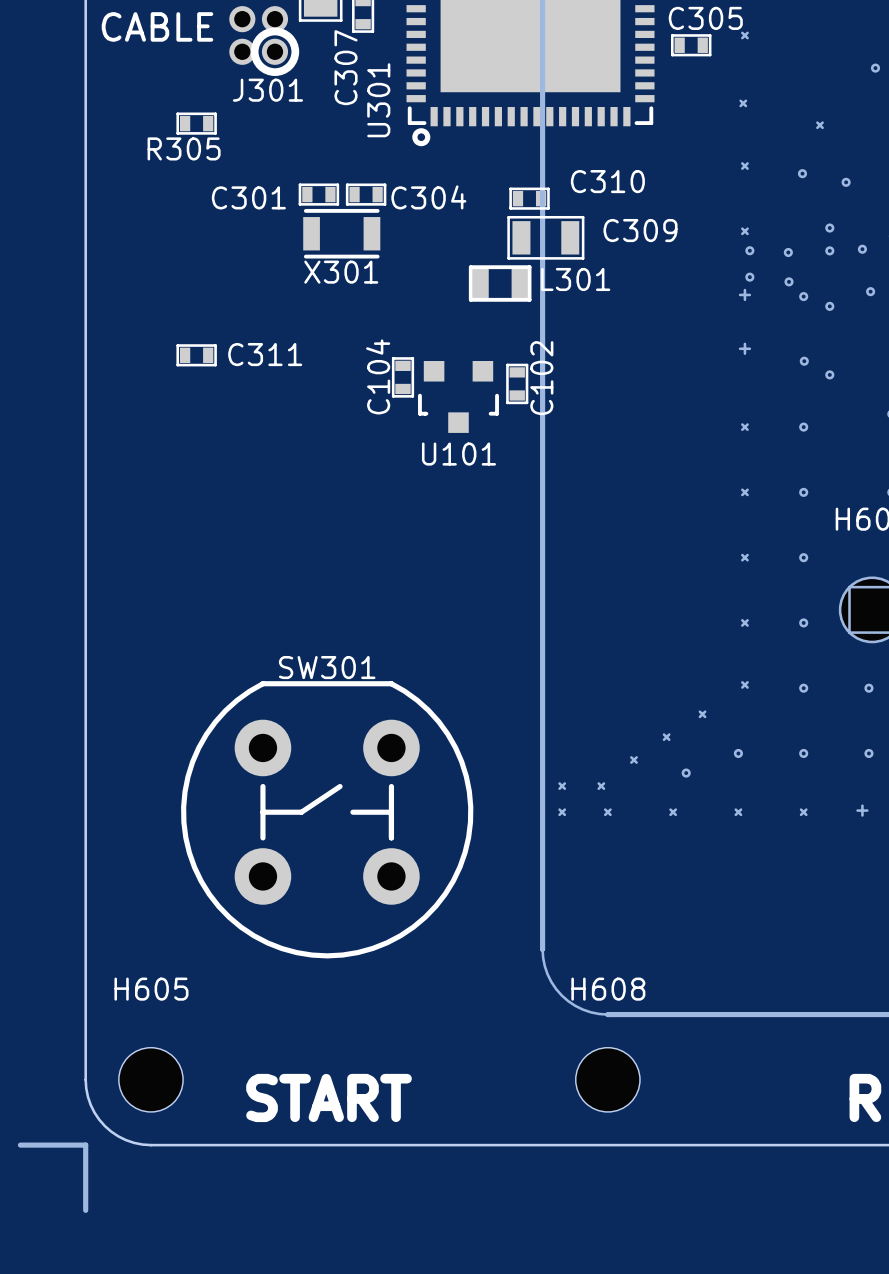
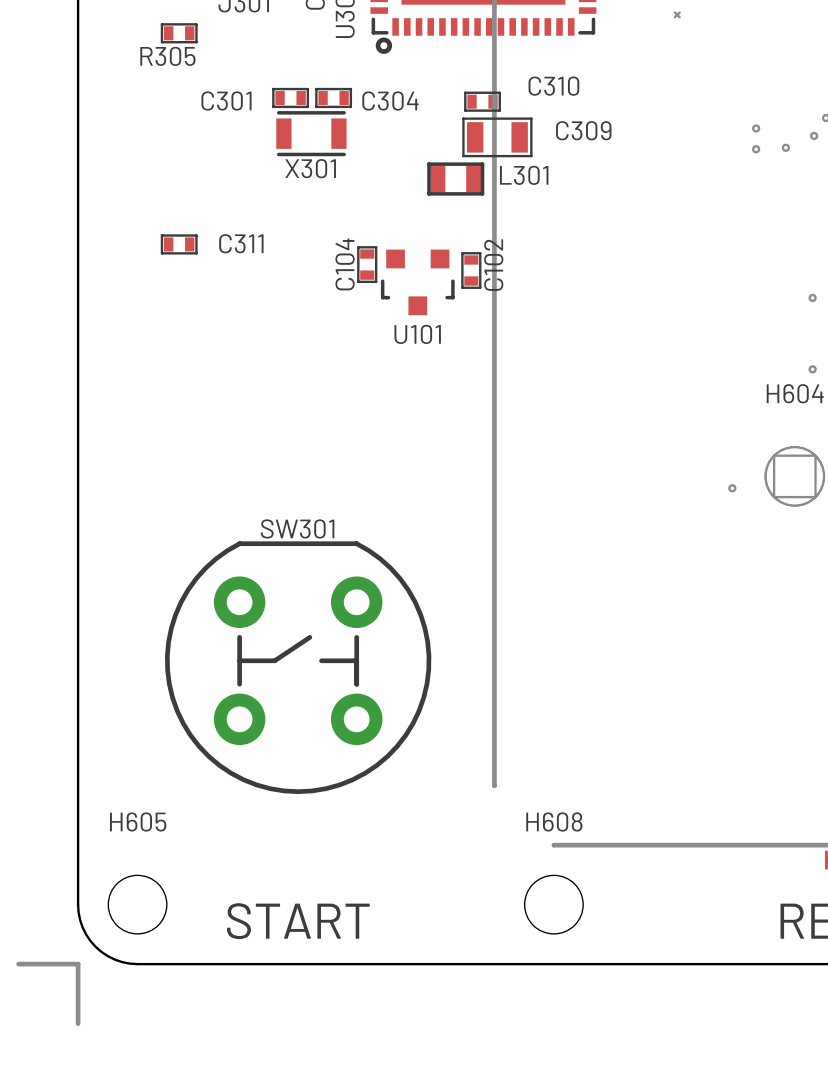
line: (817, 122) (822, 127) -> none
line: (822, 122) (817, 127) -> none
line: (742, 163) (747, 168) -> none
line: (747, 163) (742, 168) -> none
drawing: [797, 169, 808, 179] -> none
drawing: [841, 177, 851, 187] -> none
line: (742, 228) (747, 233) -> none
line: (747, 228) (742, 233) -> none
drawing: [745, 246, 835, 311] -> none
drawing: [866, 287, 876, 297] -> none
line: (744, 290) (744, 299) -> none
line: (740, 294) (749, 294) -> none
line: (744, 343) (744, 353) -> none
line: (740, 348) (749, 348) -> none
drawing: [799, 356, 835, 380] -> none
drawing: [799, 422, 809, 432] -> none
line: (742, 424) (747, 429) -> none
line: (747, 424) (742, 429) -> none
drawing: [799, 487, 809, 497] -> none
line: (742, 489) (747, 495) -> none
line: (747, 489) (742, 495) -> none
drawing: [799, 553, 809, 563] -> none
line: (742, 555) (747, 560) -> none
line: (747, 555) (742, 560) -> none
line: (742, 620) (747, 625) -> none
line: (747, 620) (742, 625) -> none
line: (742, 682) (747, 687) -> none
line: (747, 682) (742, 687) -> none
drawing: [799, 683, 809, 693] -> none
drawing: [864, 683, 874, 693] -> none
line: (699, 711) (705, 716) -> none
line: (705, 711) (699, 716) -> none
line: (663, 734) (669, 739) -> none
line: (669, 734) (663, 739) -> none
drawing: [733, 748, 743, 759] -> none
drawing: [799, 748, 809, 759] -> none
drawing: [864, 748, 874, 759] -> none
line: (631, 757) (636, 762) -> none
line: (636, 757) (631, 762) -> none
drawing: [681, 768, 691, 778] -> none
line: (559, 783) (564, 788) -> none
line: (564, 783) (559, 788) -> none
line: (598, 783) (603, 788) -> none
line: (603, 783) (598, 788) -> none
line: (862, 805) (862, 815) -> none
line: (559, 809) (564, 814) -> none
line: (564, 809) (559, 814) -> none
line: (605, 809) (610, 814) -> none
line: (610, 809) (605, 814) -> none
line: (670, 809) (675, 814) -> none
line: (675, 809) (670, 814) -> none
line: (735, 809) (741, 814) -> none
line: (741, 809) (735, 814) -> none
line: (801, 809) (806, 814) -> none
line: (806, 809) (801, 814) -> none
line: (857, 810) (867, 810) -> none
line: (542, 949) (547, 974) (561, 995) (582, 1009) (607, 1014) -> none

